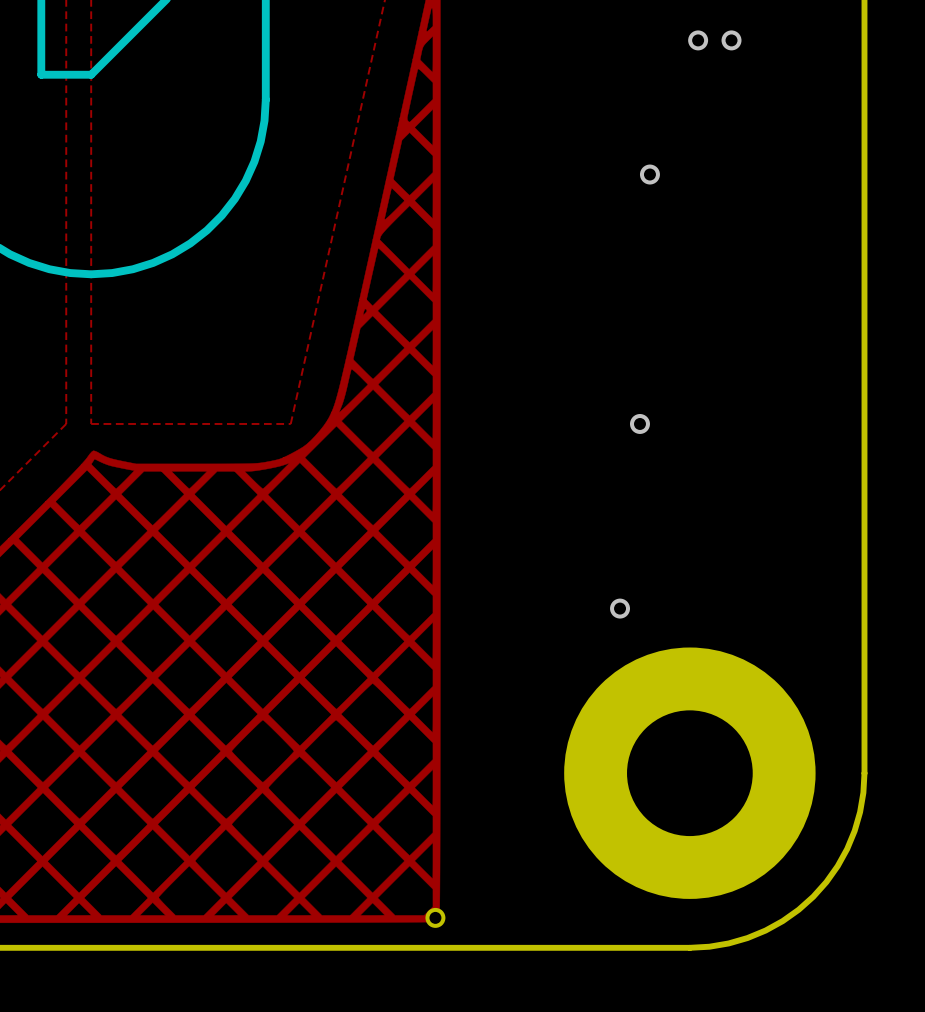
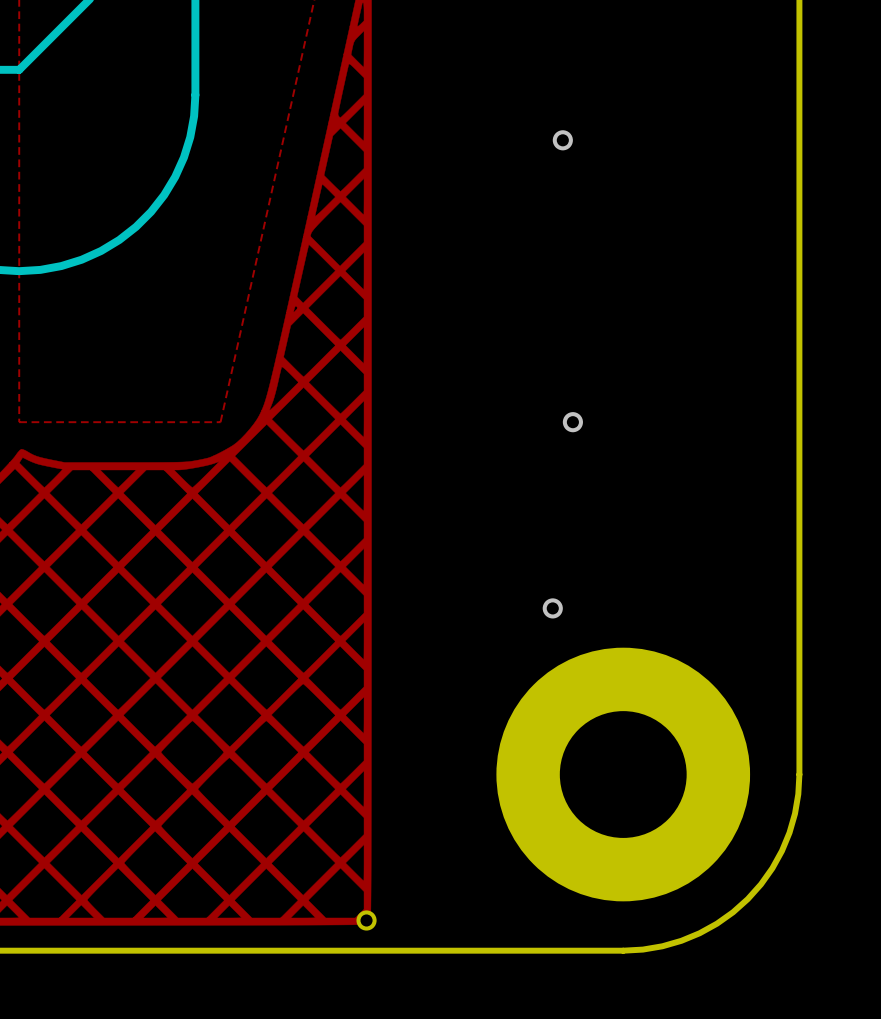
via: (698, 40) -> none
via: (731, 40) -> none
via position: (649, 174) -> (562, 140)

